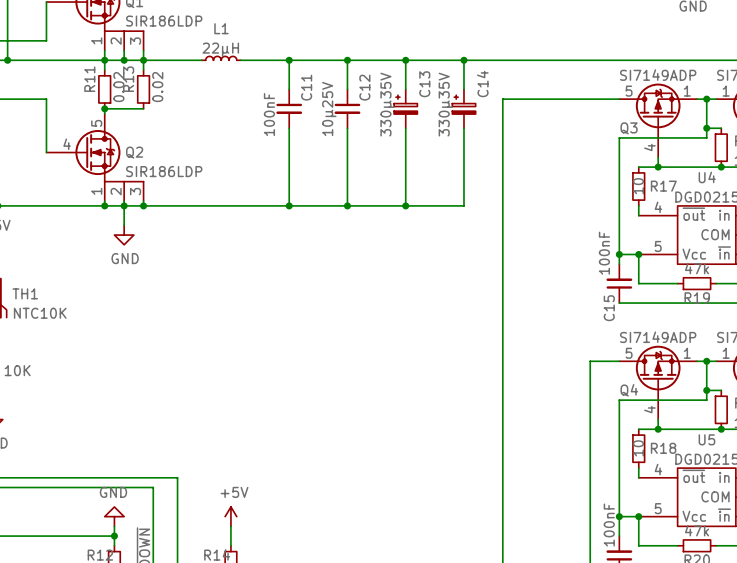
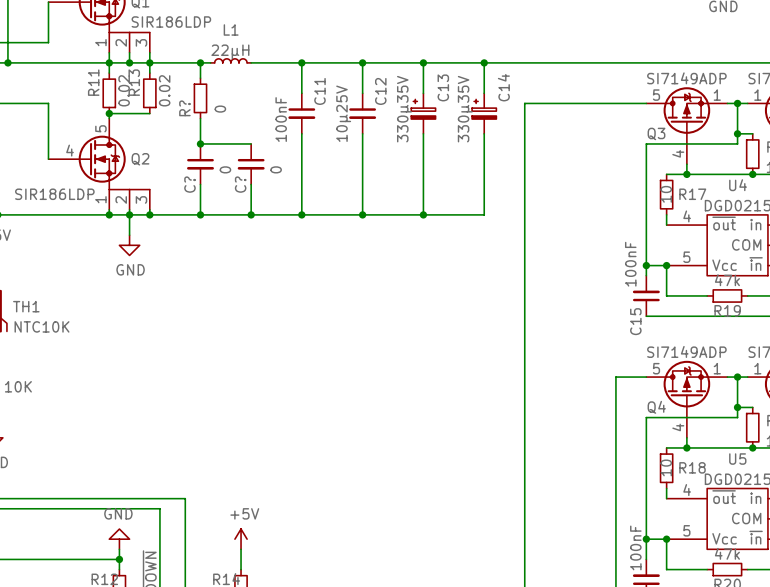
wire: none -> (200, 62) (200, 78)
junction: none -> (200, 62)
R?: none -> 0 (200, 98)
wire: none -> (200, 118) (200, 143) (251, 143)
junction: none -> (200, 143)
C?: none -> 0 (200, 164)
C?: none -> 0 (251, 164)
Q2 value position: SIR186LDP (164, 171) -> SIR186LDP (54, 194)
wire: none -> (200, 184) (200, 214)
wire: none -> (251, 184) (251, 214)
junction: none -> (200, 214)
junction: none -> (251, 214)

